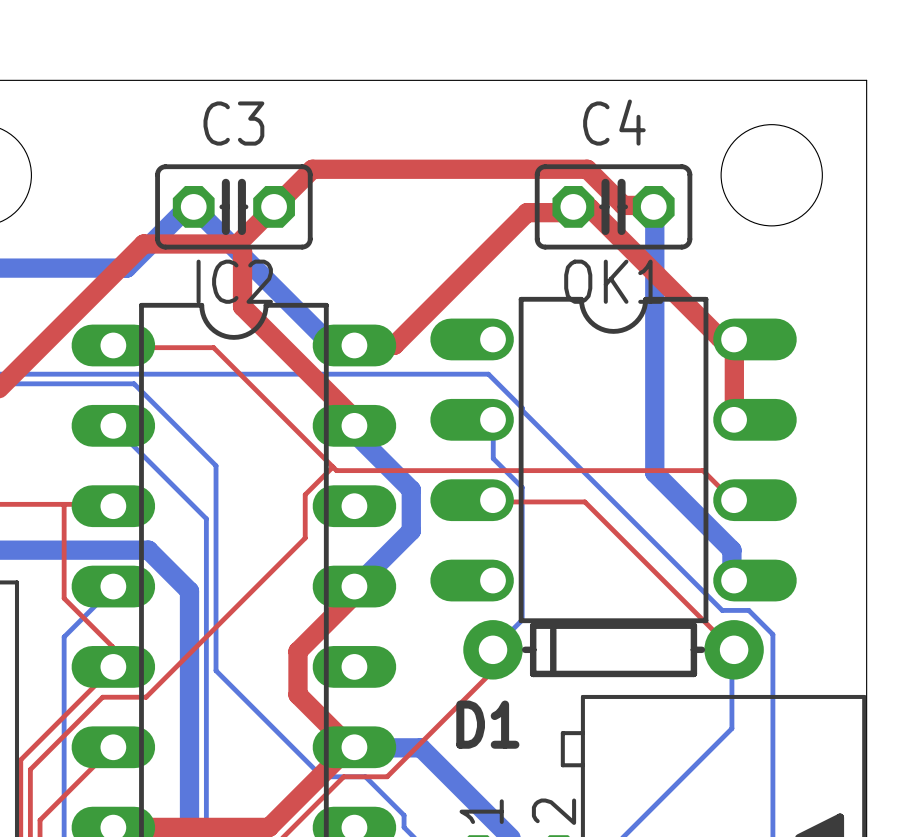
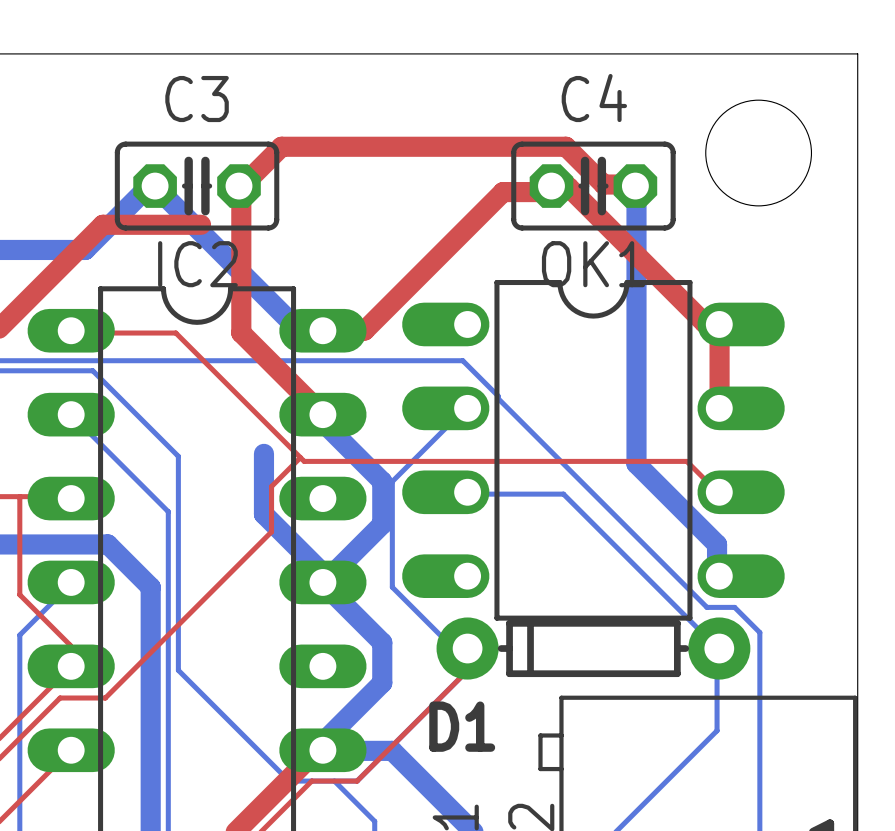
top track: (314, 169) (312, 169) (237, 244) (242, 251) (242, 306) (353, 417) (353, 424) -> (281, 146) (248, 179) (239, 186) (241, 187) (241, 333) (321, 413)
bottom track: (493, 419) (493, 458) (522, 487) (522, 620) (493, 649) -> (467, 408) (392, 481) (392, 587) (455, 650) (467, 648) (465, 650) (465, 672) (357, 781) (334, 781)
bottom track: none -> (263, 453) (263, 514) (321, 572) (321, 582) (382, 642) (382, 682) (324, 740) (322, 750)
top track: (493, 500) (493, 501) (584, 501) (734, 649) -> none
bottom track: none -> (467, 492) (467, 494) (563, 494) (719, 648)
top track: (354, 586) (353, 595) (297, 651) (297, 694) (343, 740) (354, 747) -> none

